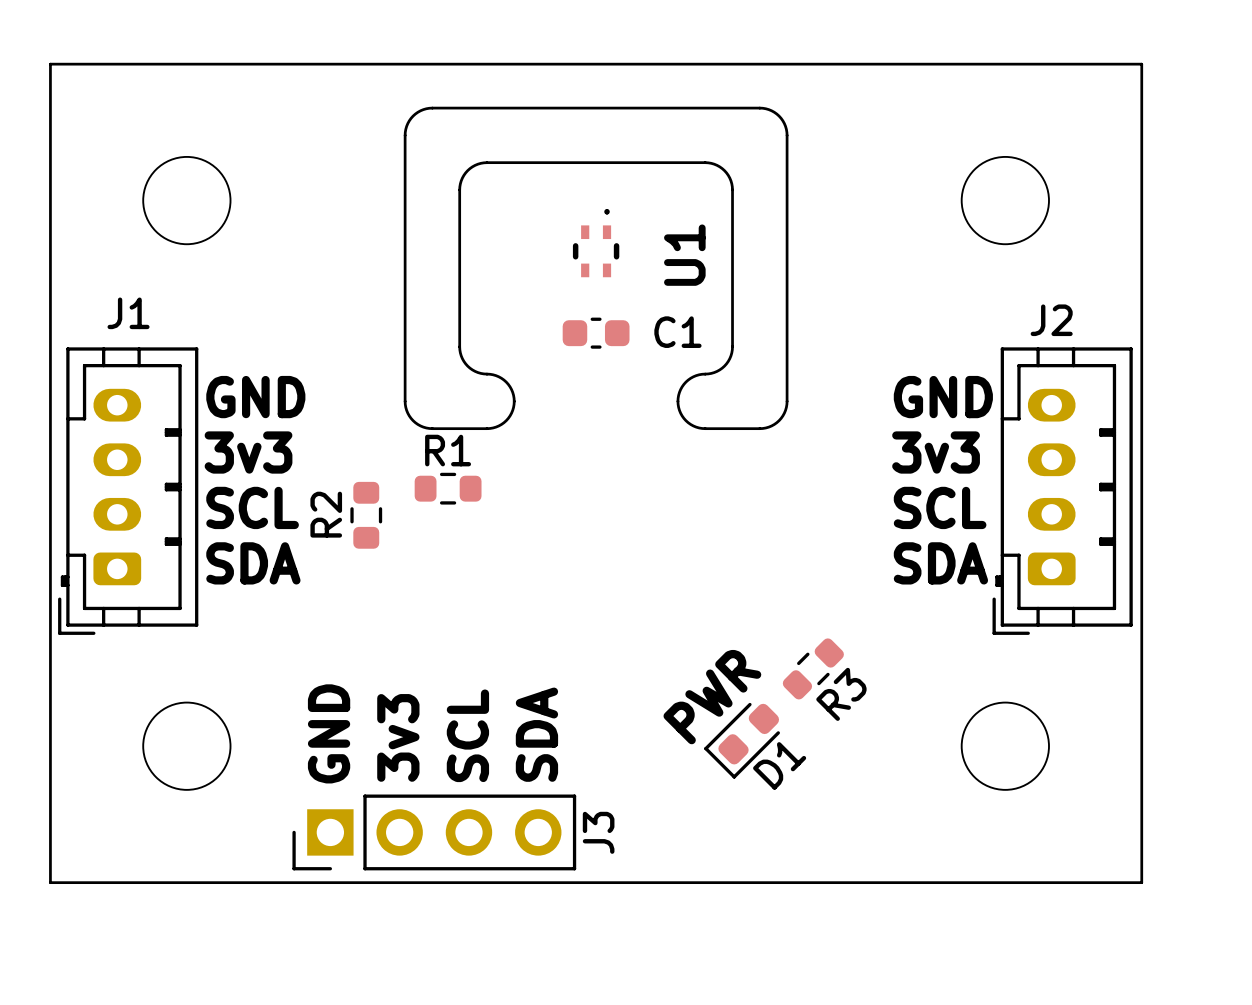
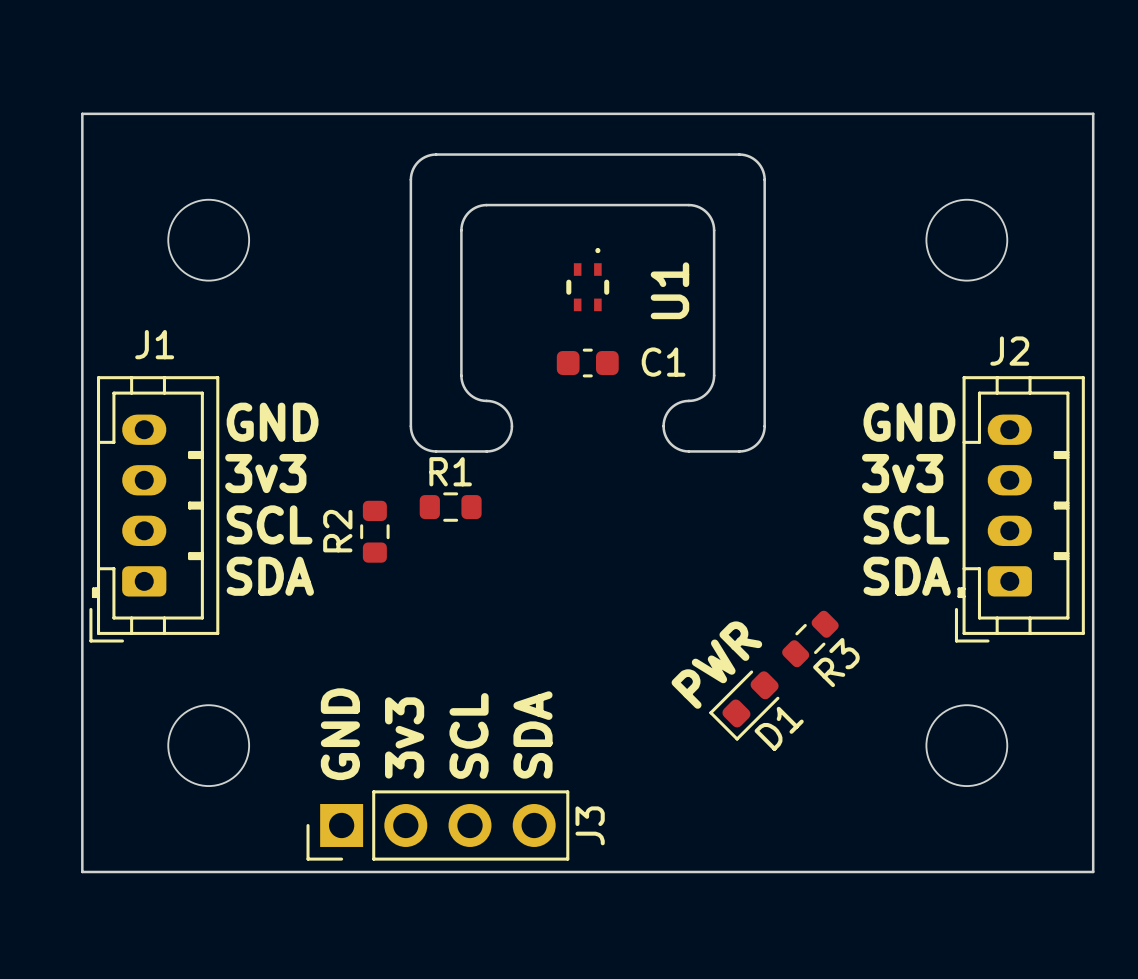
R3 position: (813, 668) -> (810, 638)
text position: PWR (712, 697) -> PWR (716, 665)
D1 position: (742, 740) -> (744, 705)

